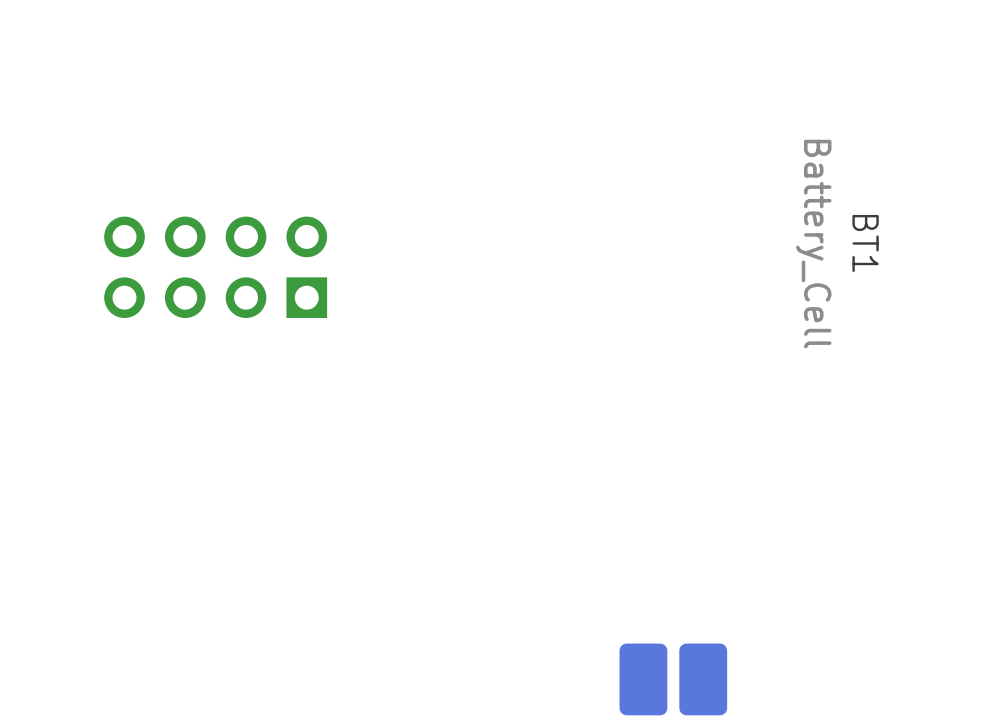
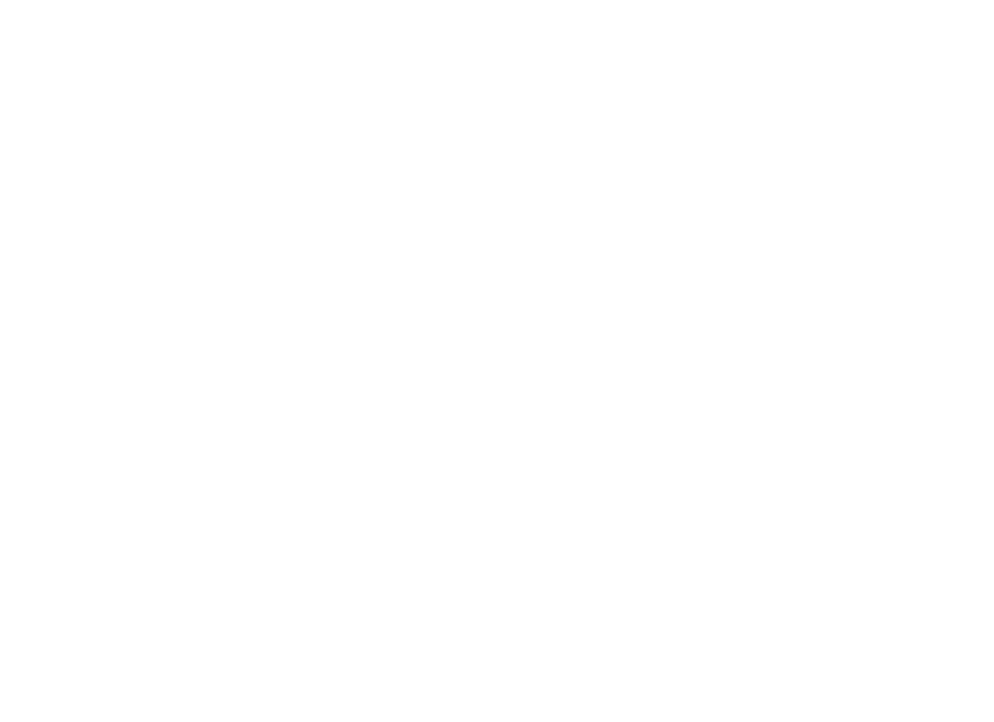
part: (215, 267) -> none
BT1: Battery_Cell (673, 679) -> none

